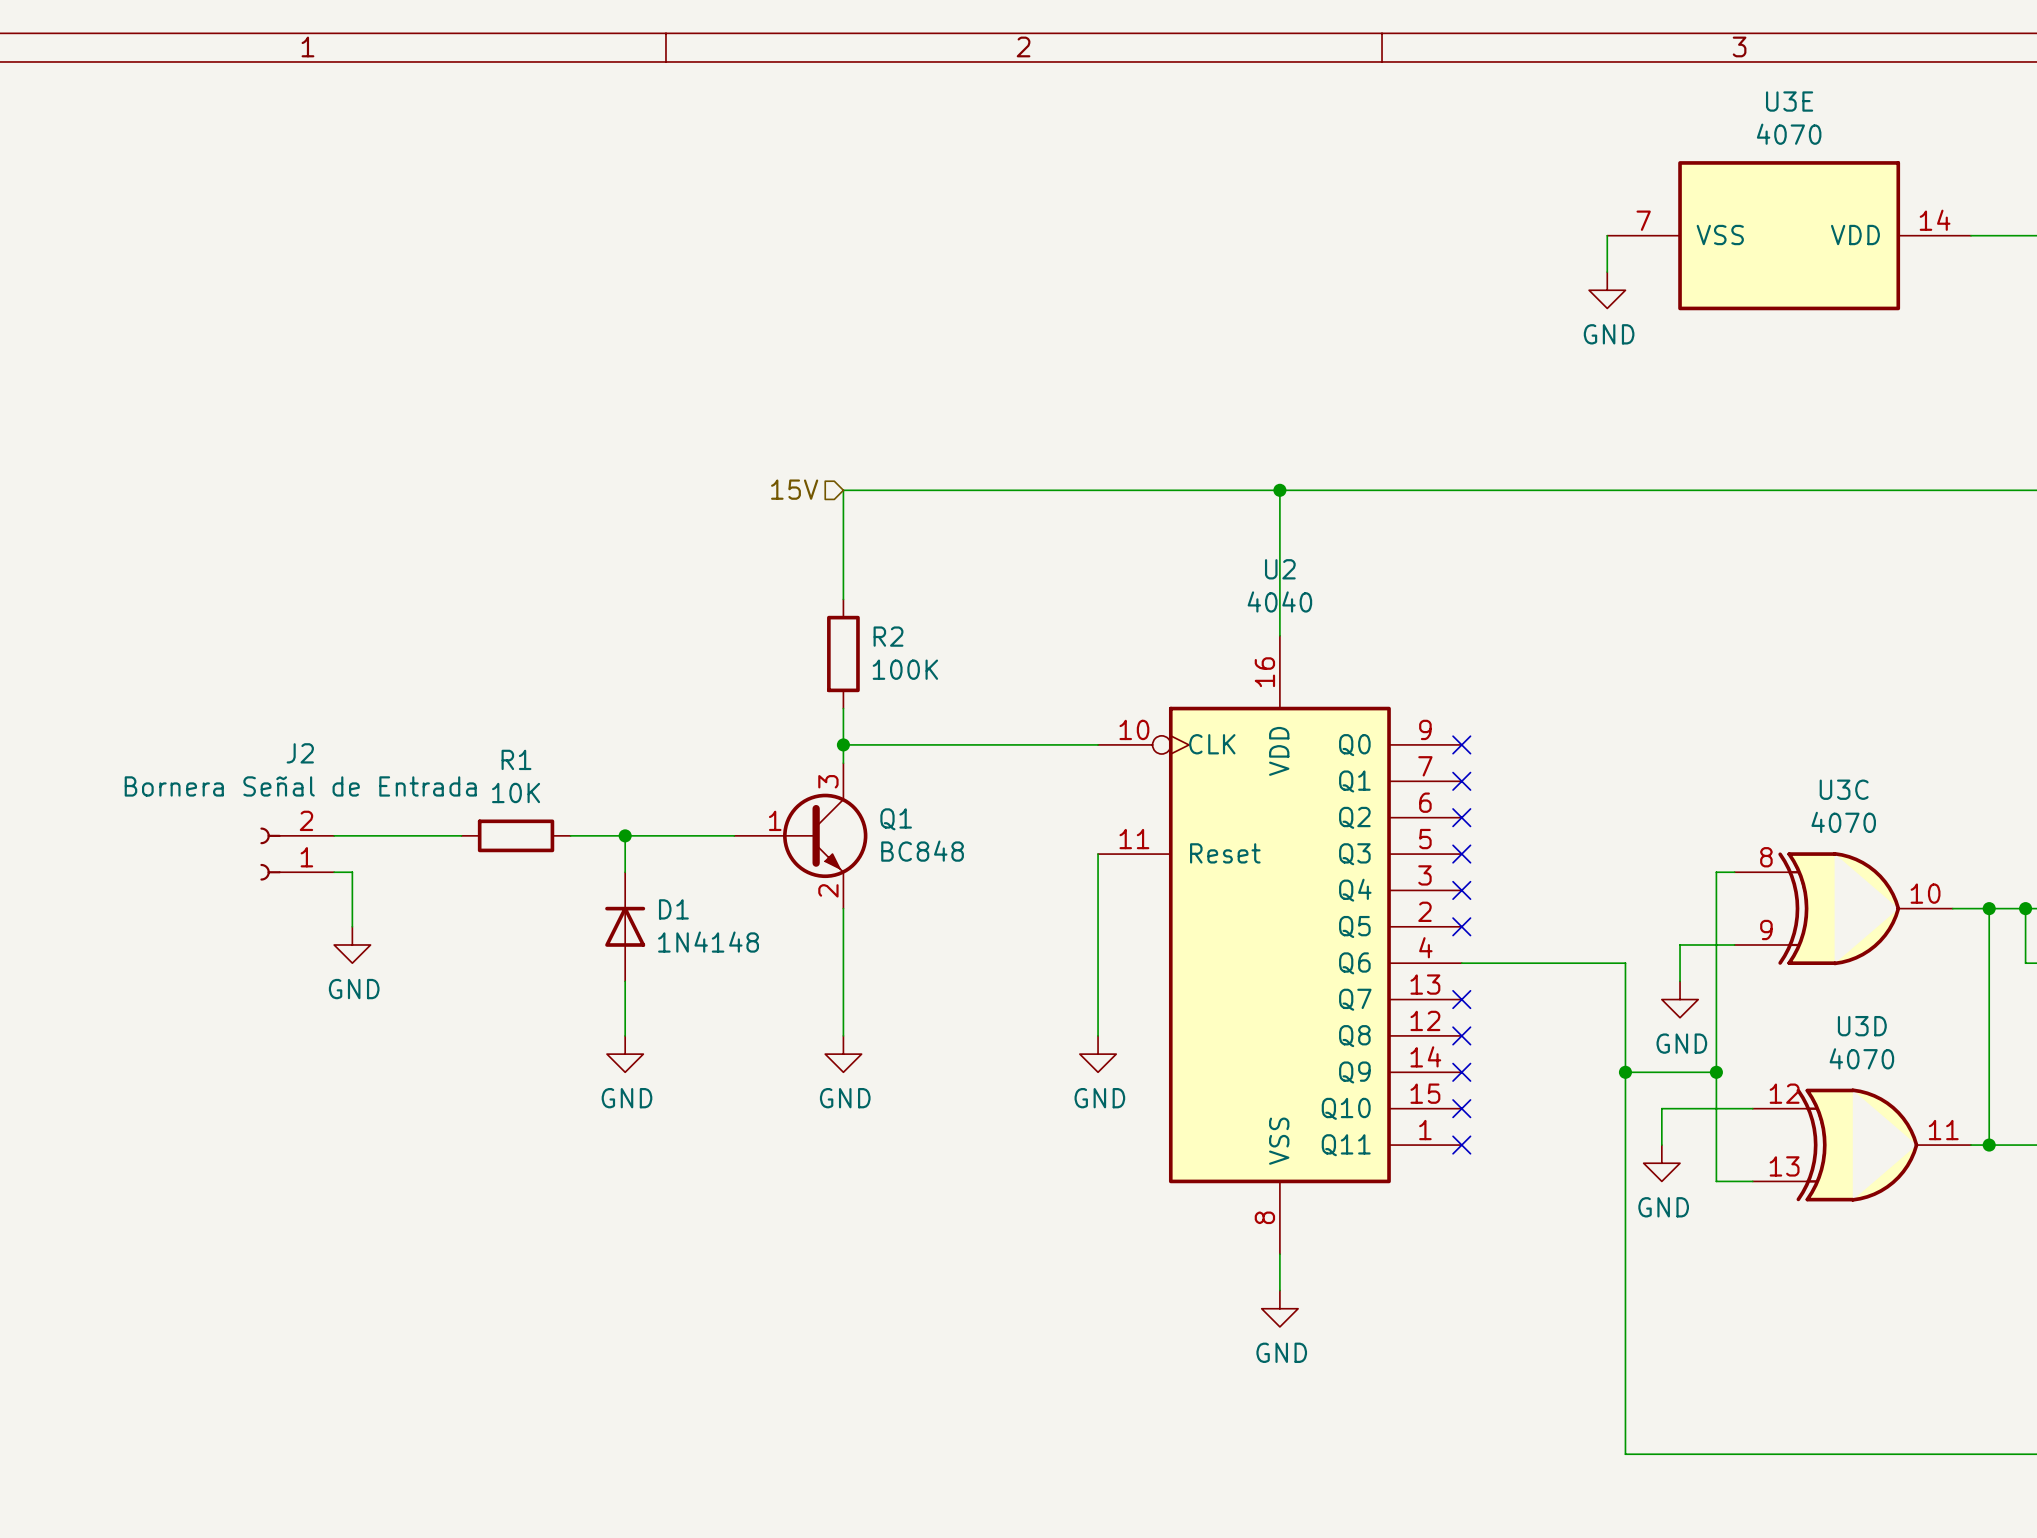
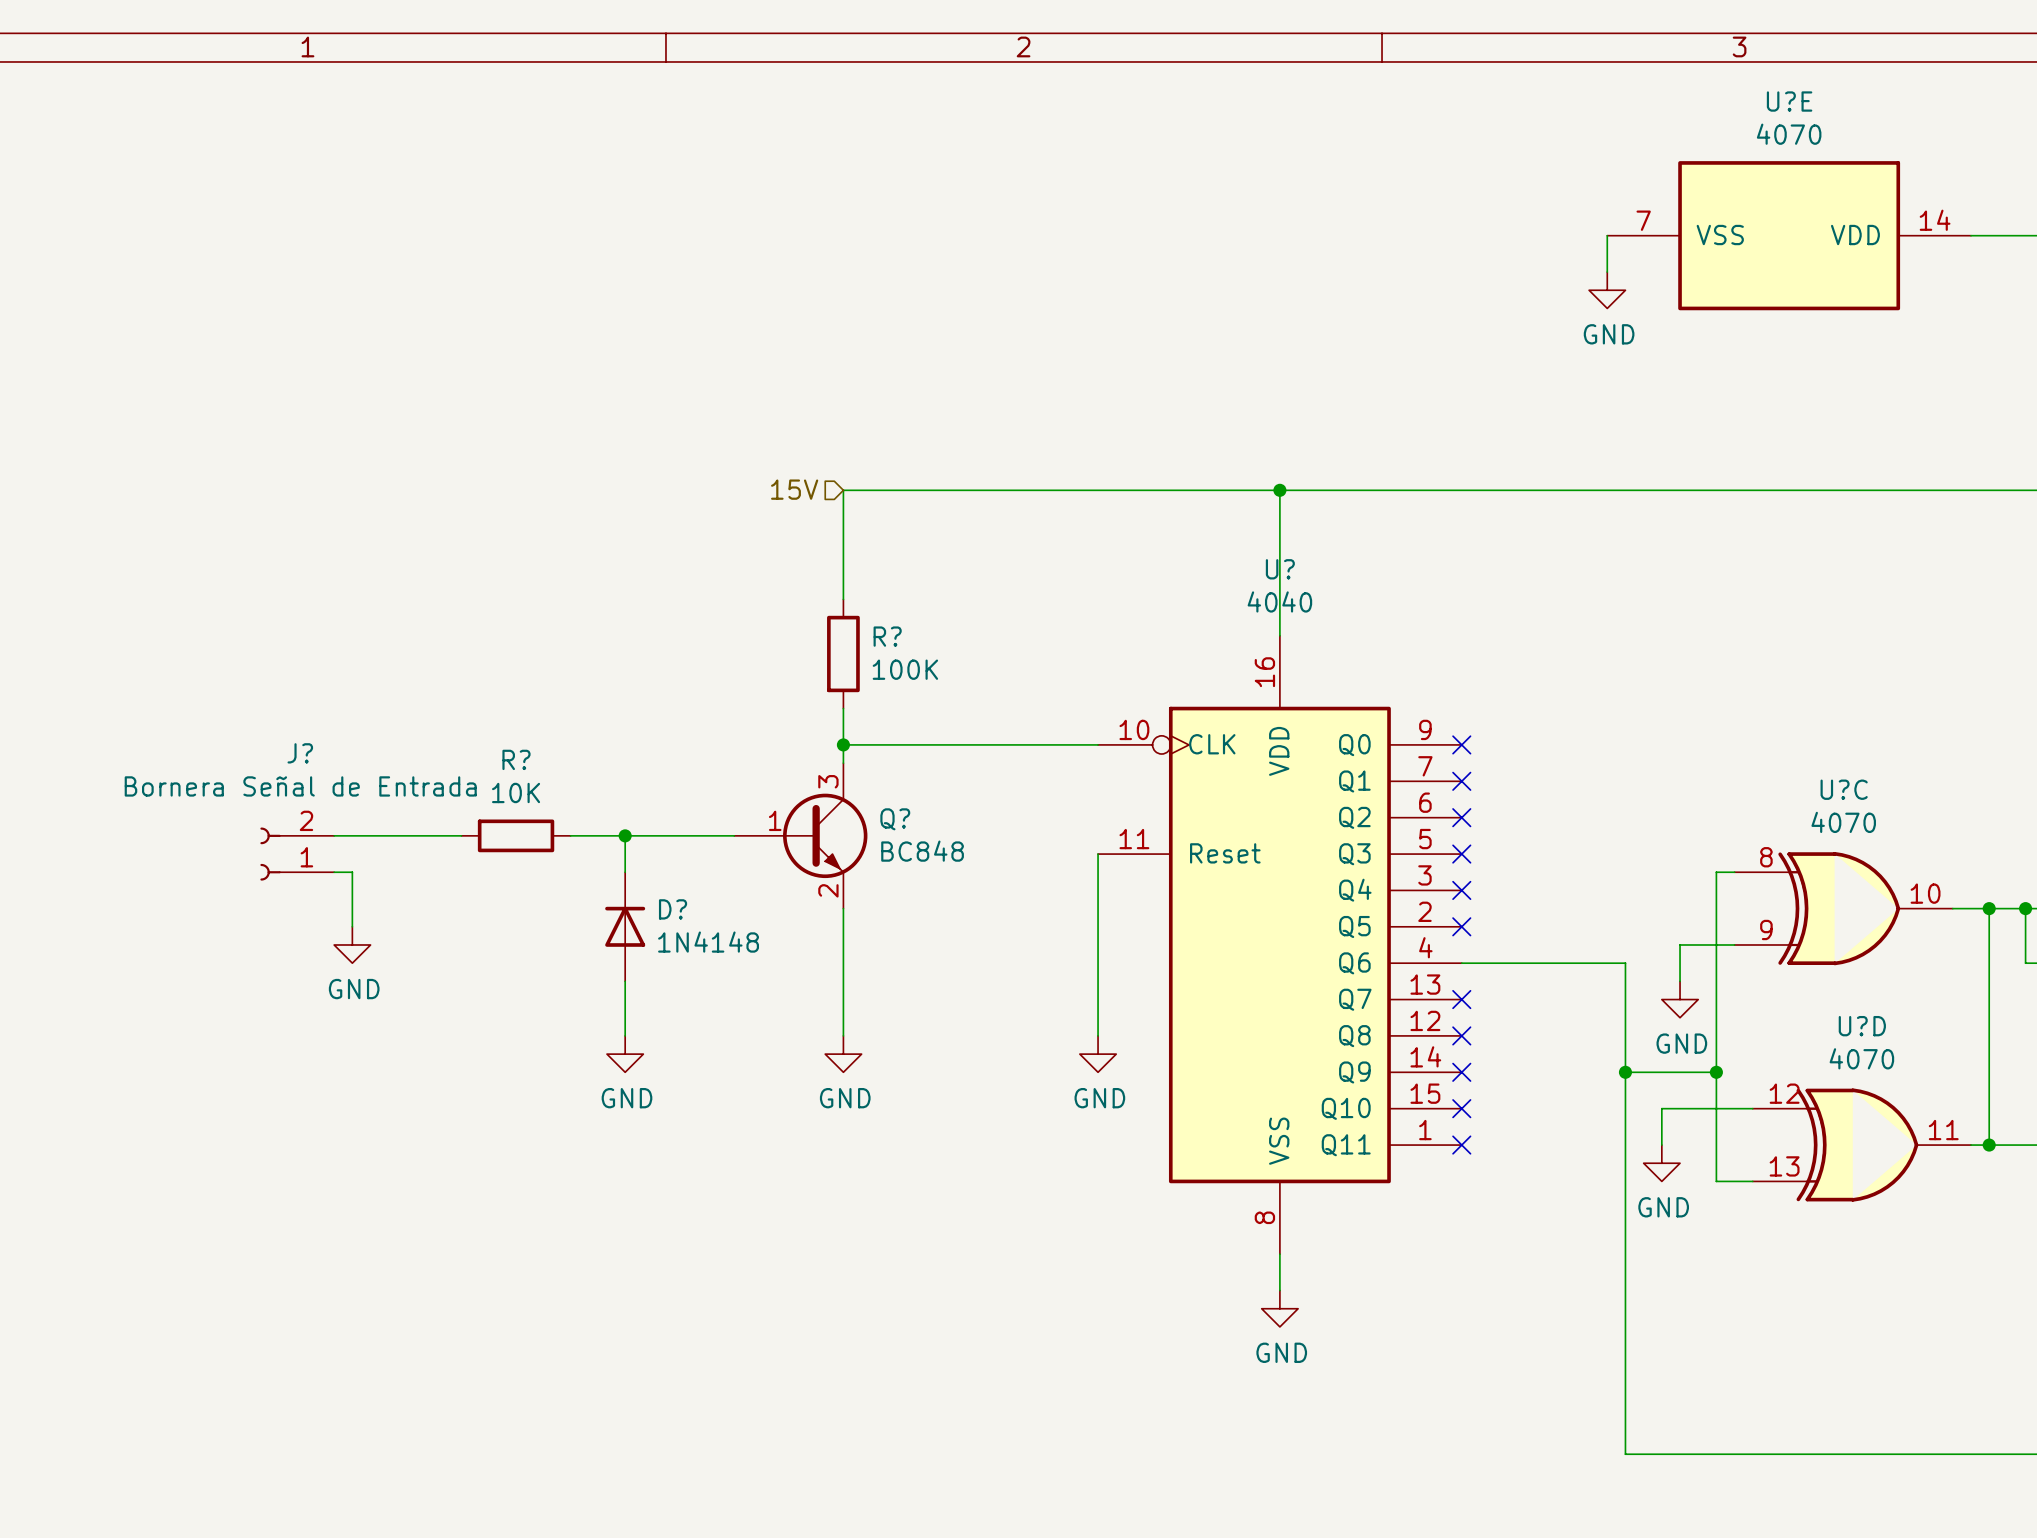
U3E name: U3E (1789, 101) -> U?E (1789, 101)
U2 name: U2 (1280, 569) -> U? (1280, 569)
R2 name: R2 (888, 636) -> R? (887, 636)
J2 name: J2 (300, 753) -> J? (300, 753)
R1 name: R1 (516, 759) -> R? (516, 759)
U3C name: U3C (1844, 789) -> U?C (1844, 789)
Q1 name: Q1 (896, 819) -> Q? (895, 819)
D1 name: D1 (673, 909) -> D? (673, 909)
U3D name: U3D (1862, 1026) -> U?D (1862, 1026)

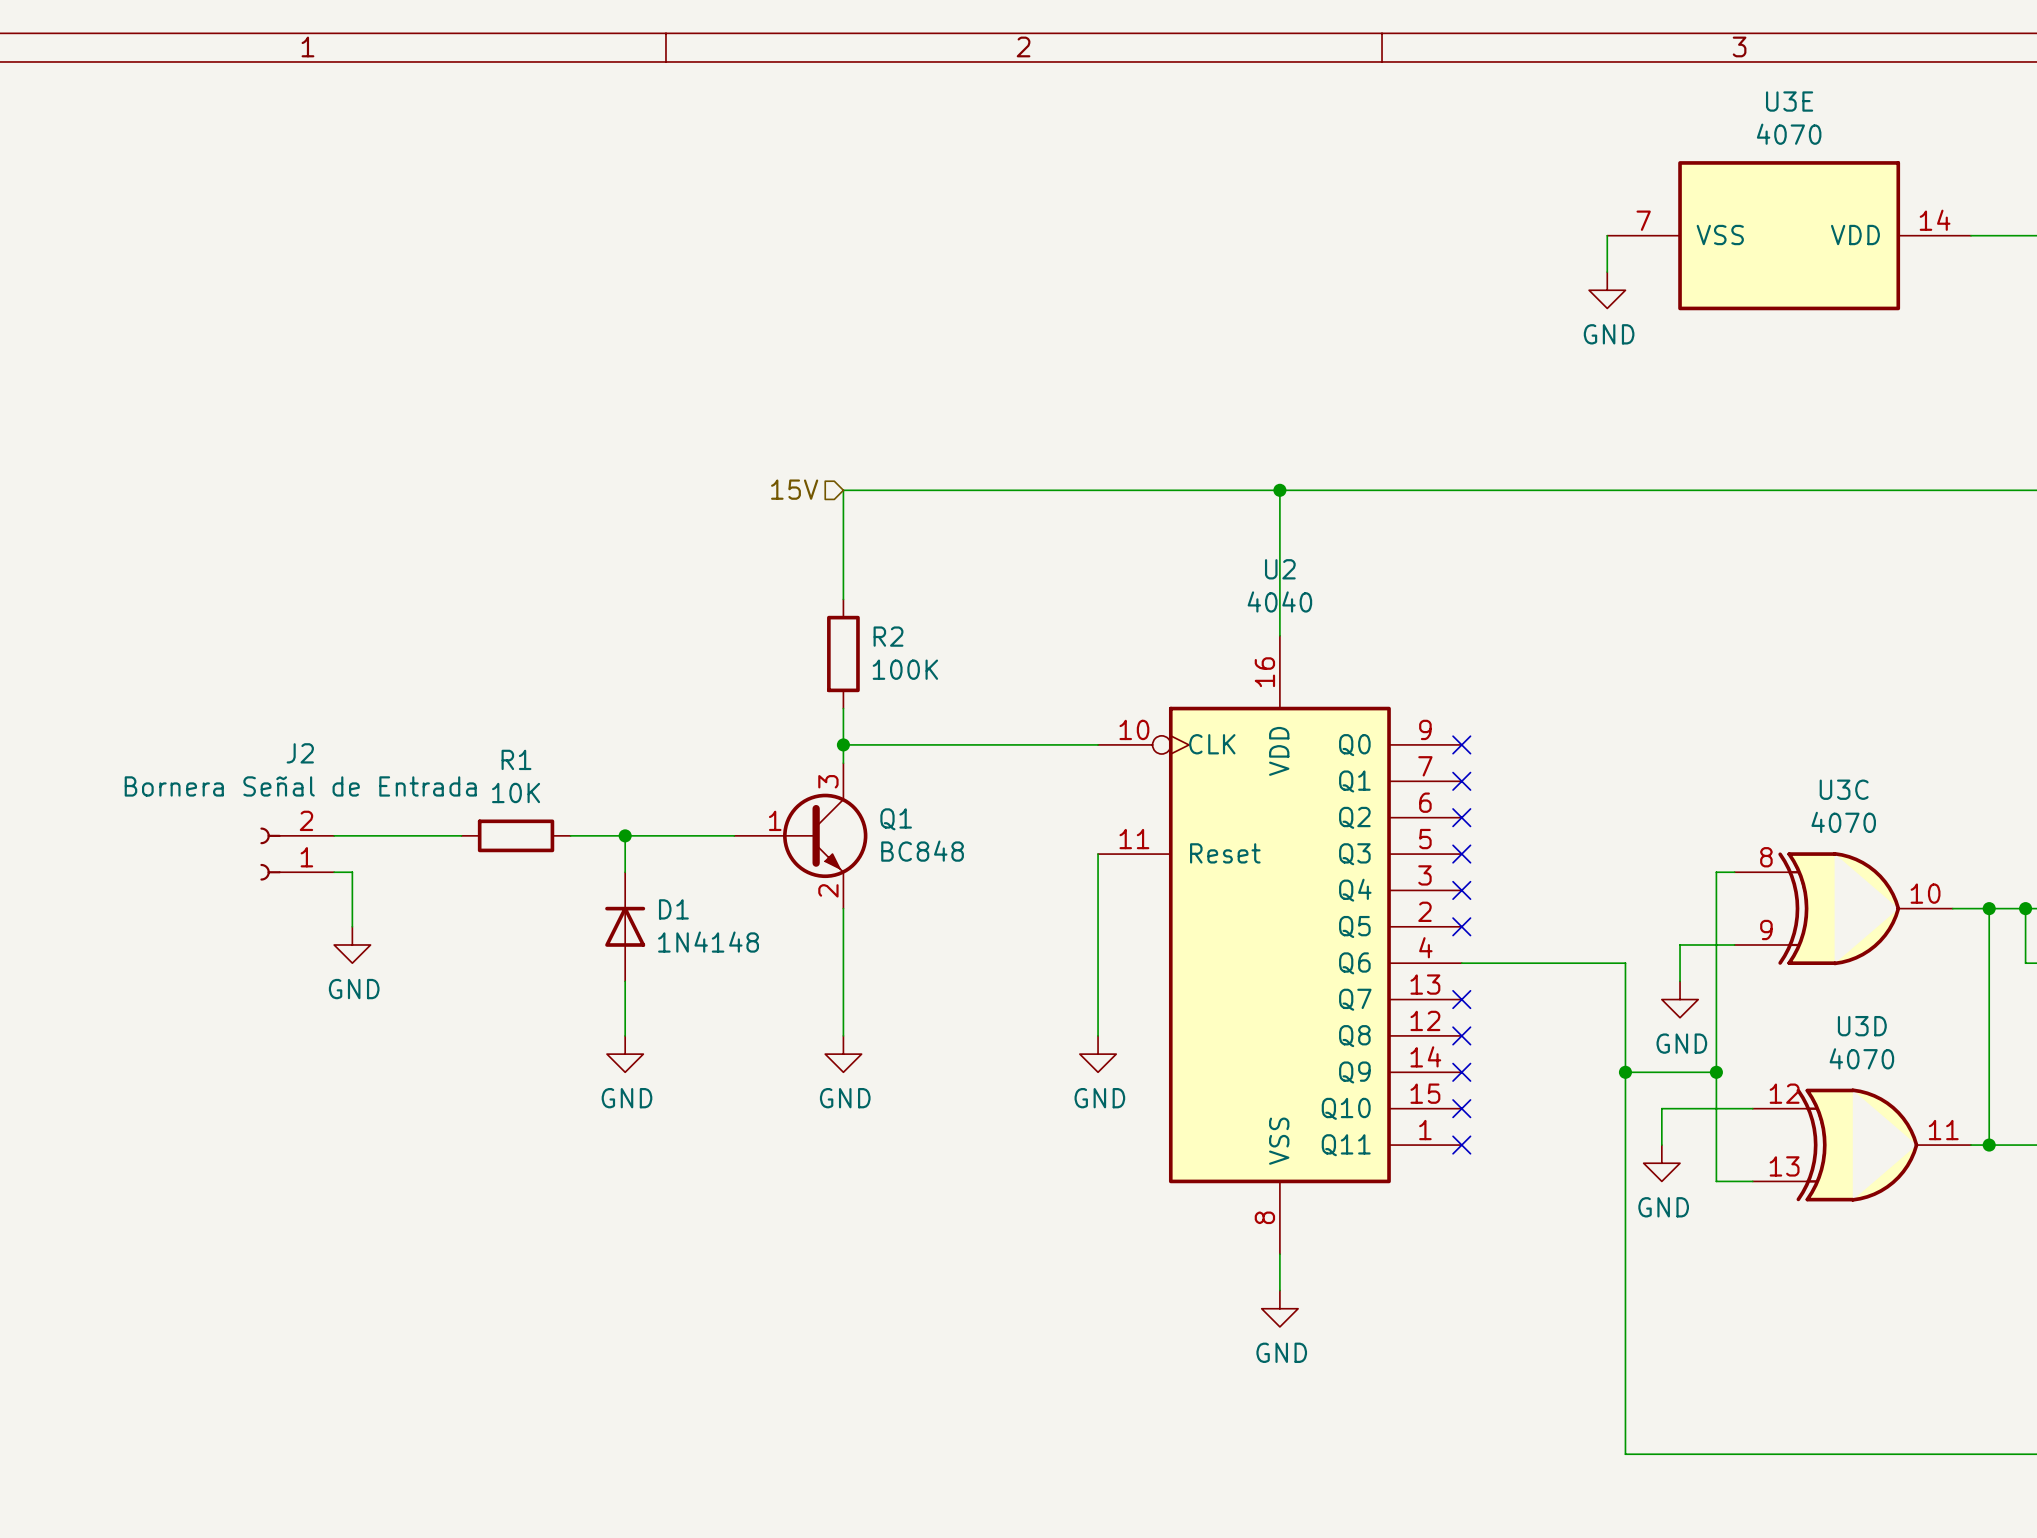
U?E name: U?E (1789, 101) -> U3E (1789, 101)
U? name: U? (1280, 569) -> U2 (1280, 569)
R? name: R? (887, 636) -> R2 (888, 636)
J? name: J? (300, 753) -> J2 (300, 753)
R? name: R? (516, 759) -> R1 (516, 759)
U?C name: U?C (1844, 789) -> U3C (1844, 789)
Q? name: Q? (895, 819) -> Q1 (896, 819)
D? name: D? (673, 909) -> D1 (673, 909)
U?D name: U?D (1862, 1026) -> U3D (1862, 1026)

